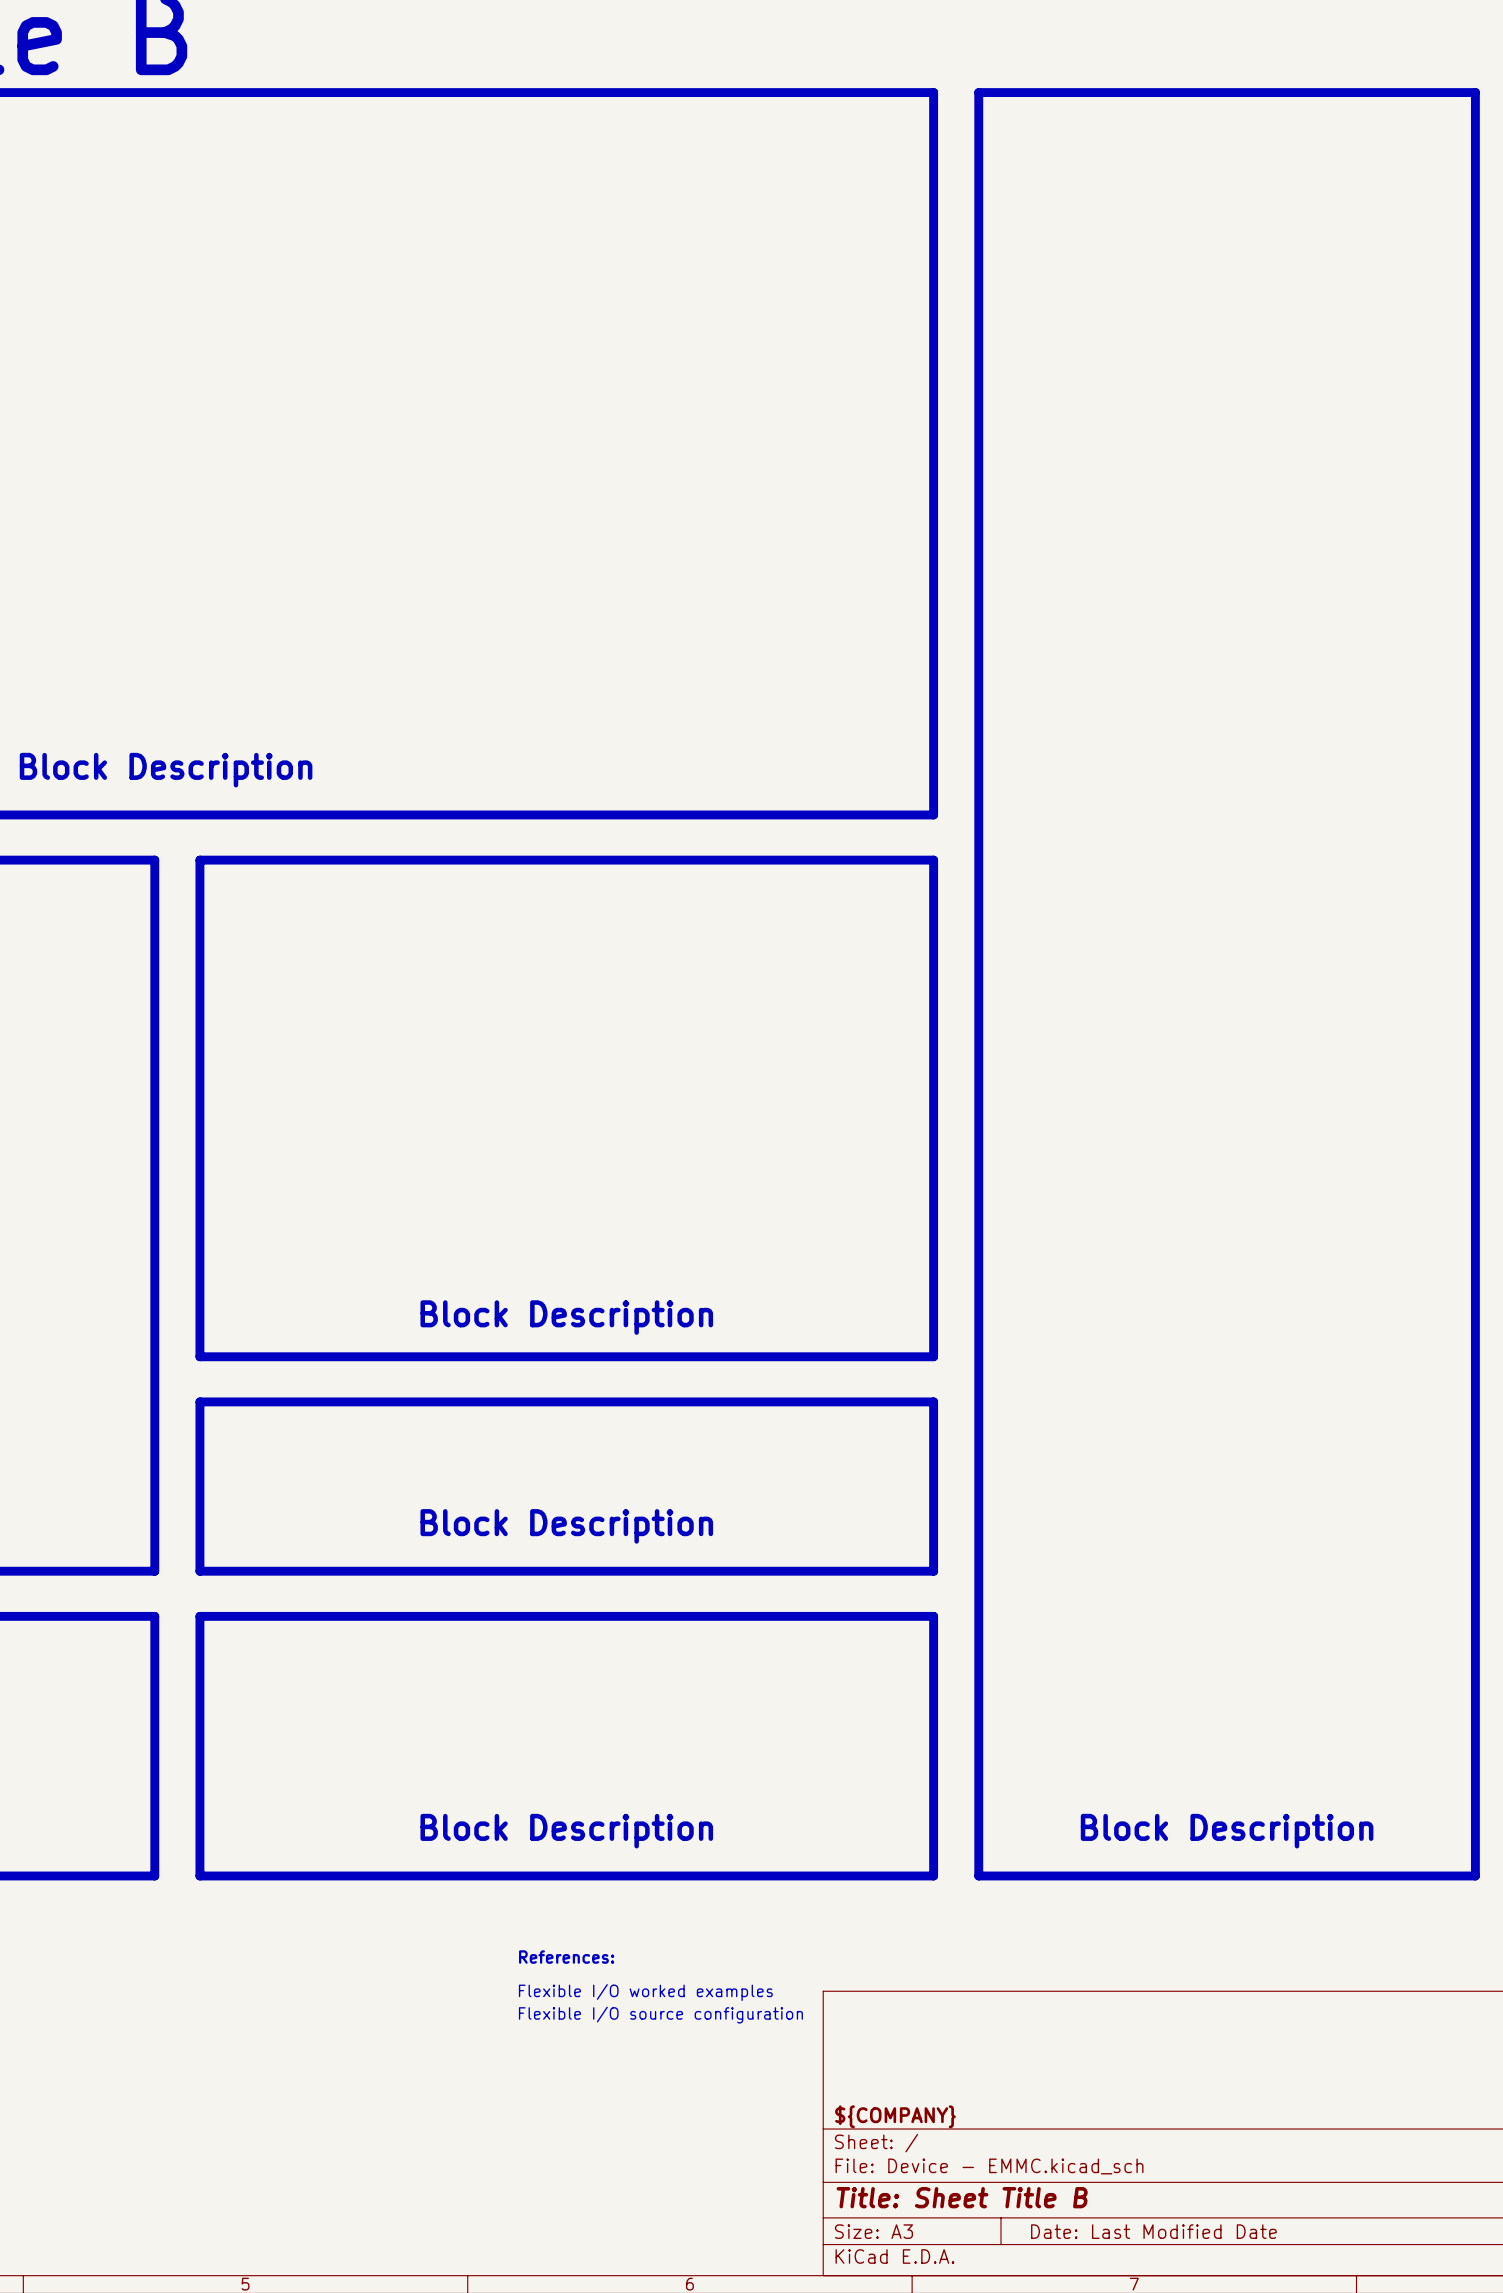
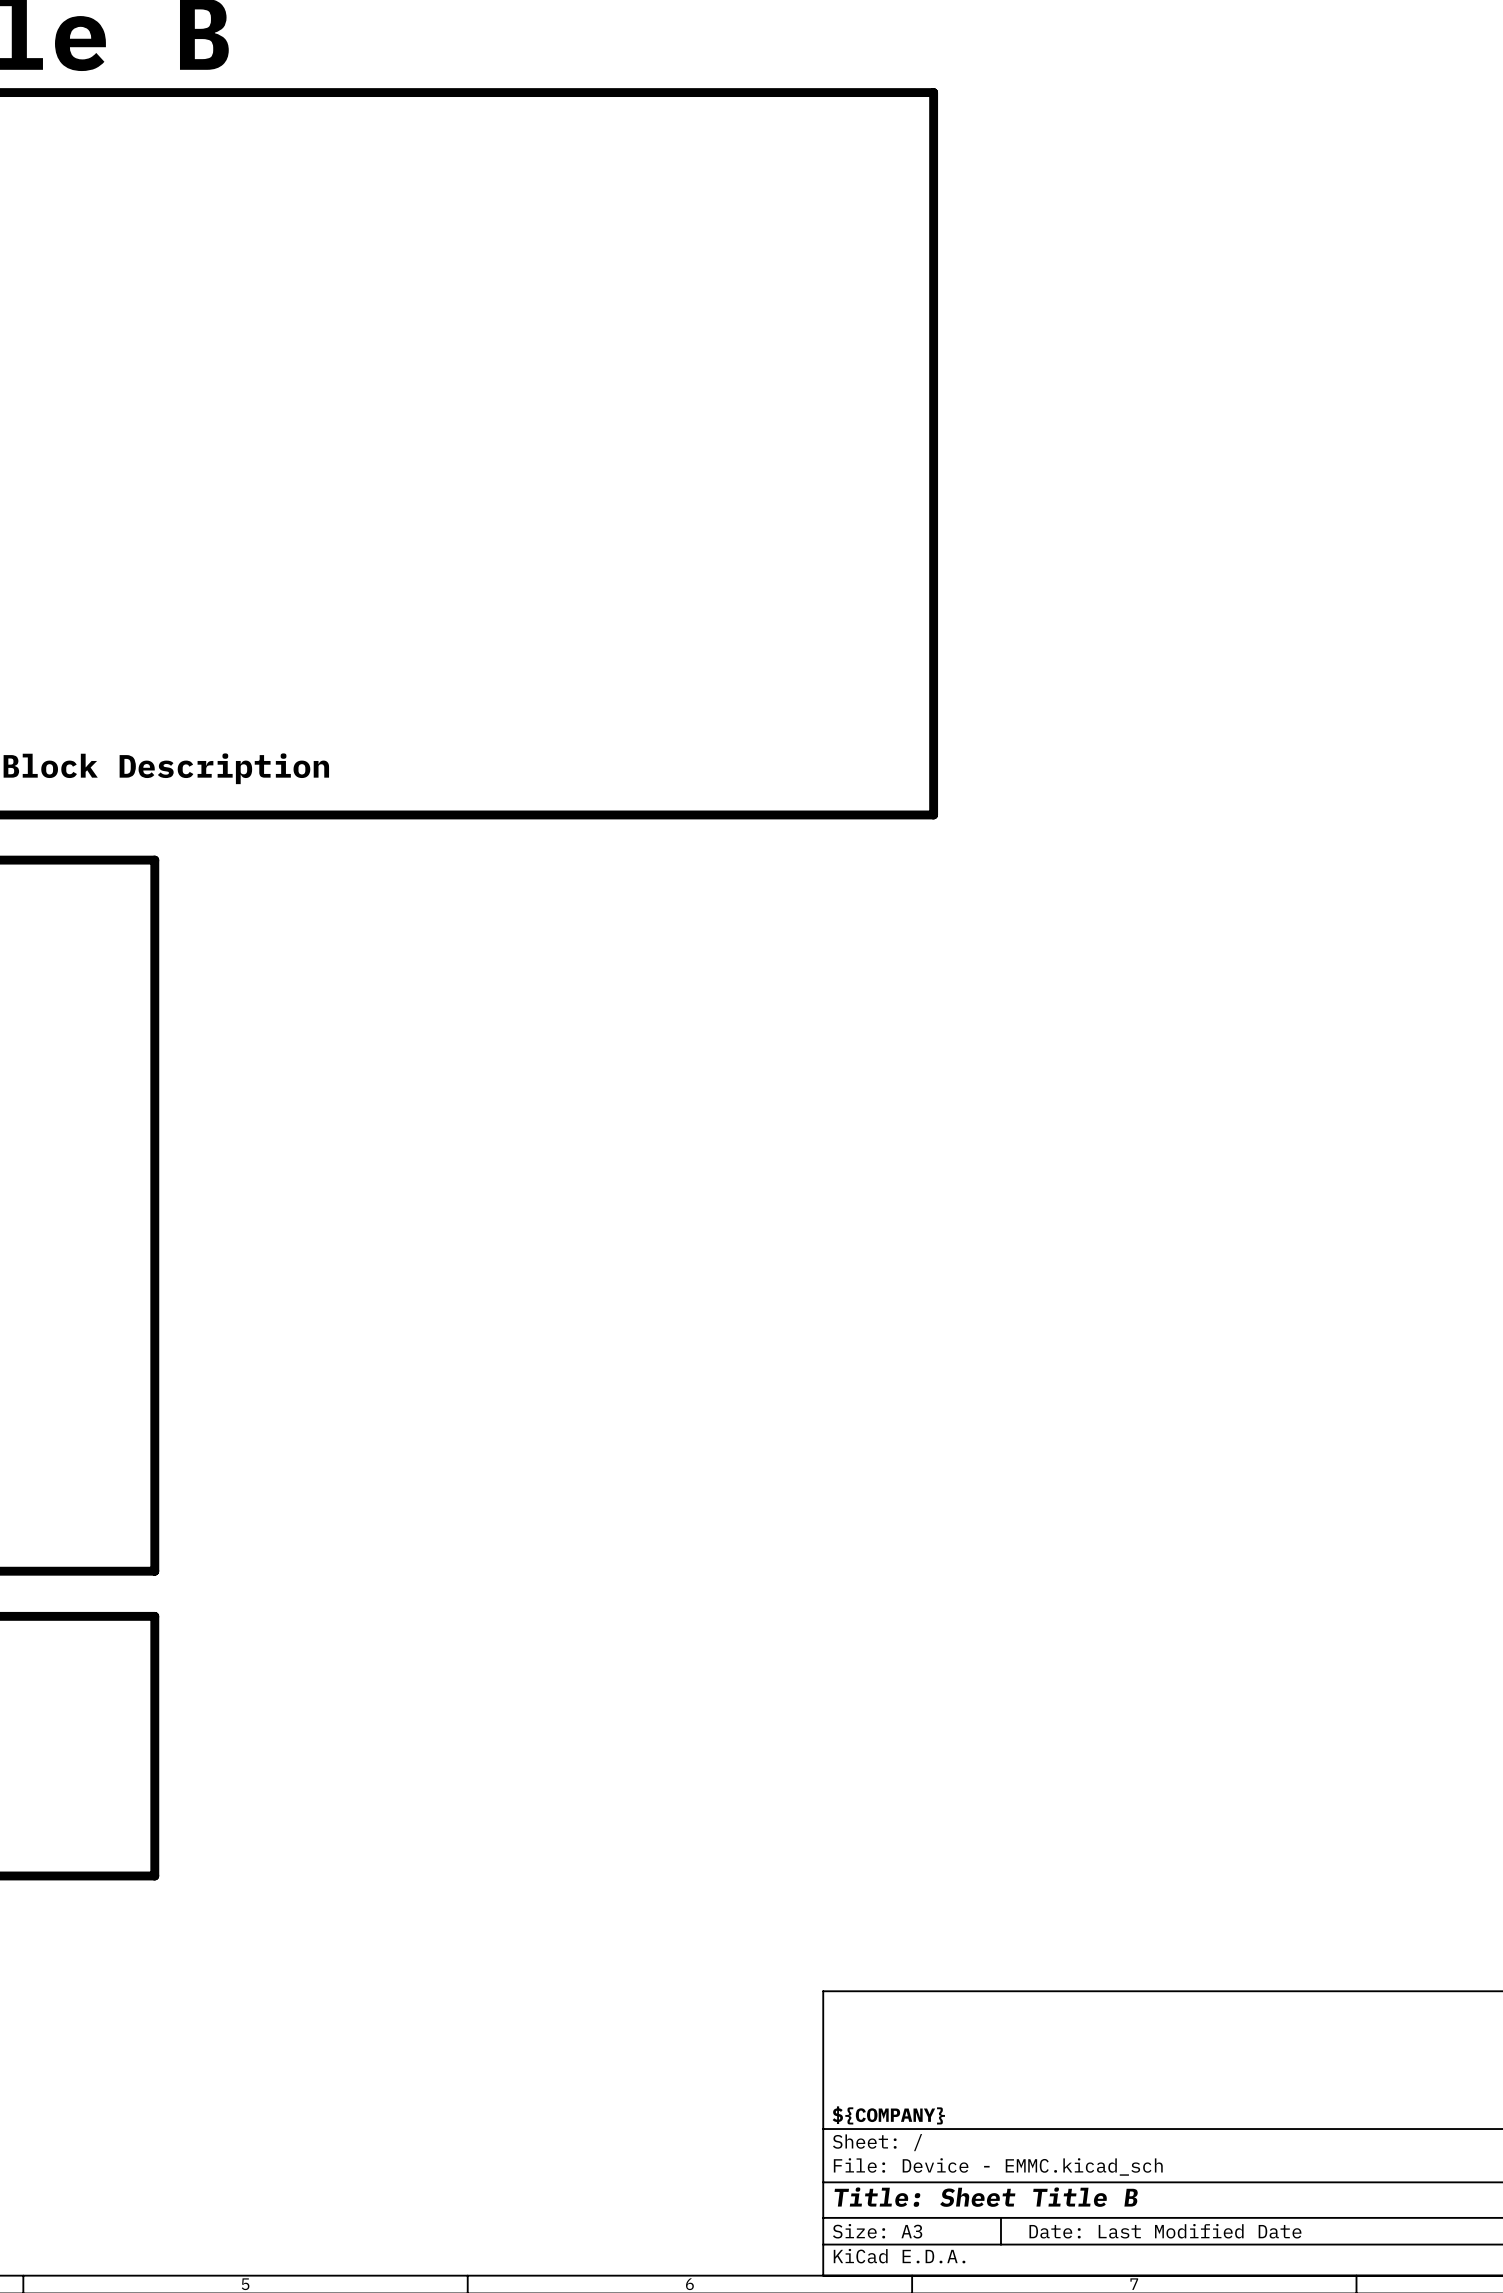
line: (978, 92) (1475, 92) (1475, 1875) (978, 1875) (978, 92) -> none
line: (199, 860) (933, 860) (933, 1356) (199, 1356) (199, 860) -> none
text: Block Description (566, 1317) -> none
line: (199, 1401) (933, 1401) (933, 1571) (199, 1571) (199, 1401) -> none
text: Block Description (566, 1526) -> none
line: (199, 1616) (199, 1875) (933, 1875) (933, 1616) (199, 1616) -> none
text: Block Description (566, 1831) -> none
text: Block Description (1227, 1831) -> none
text: References: (566, 1957) -> none
text: Flexible I/O worked examples (645, 1992) -> none
text: Flexible I/O source configuration (660, 2015) -> none

